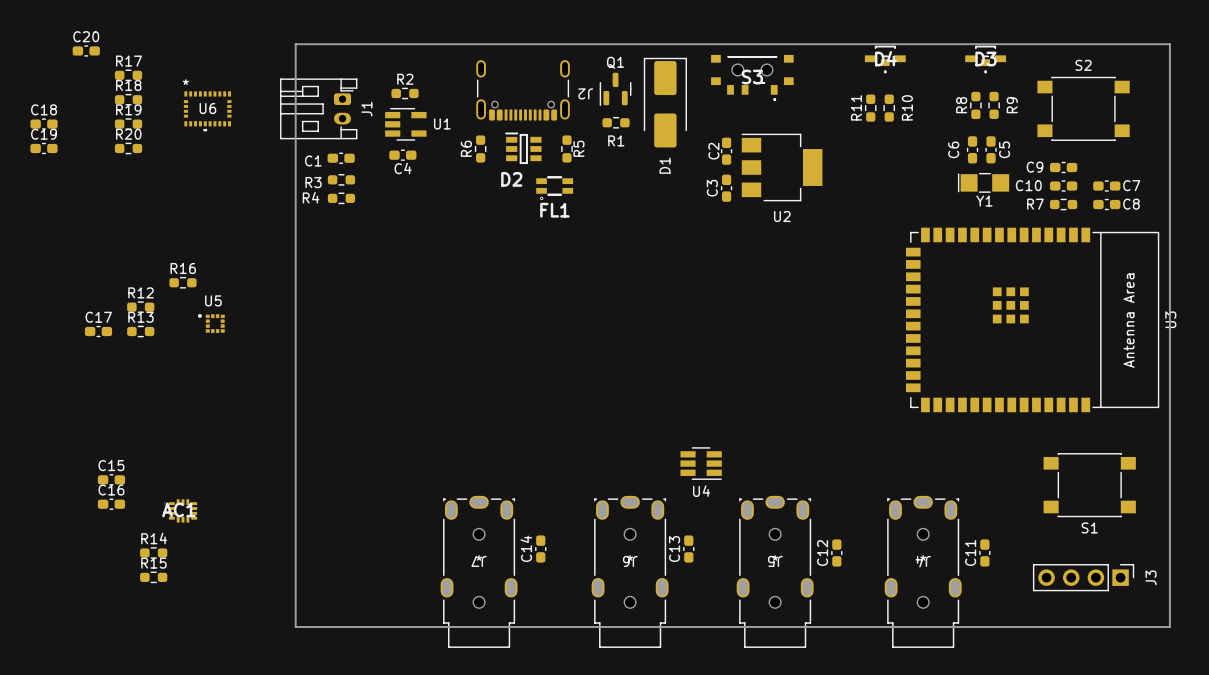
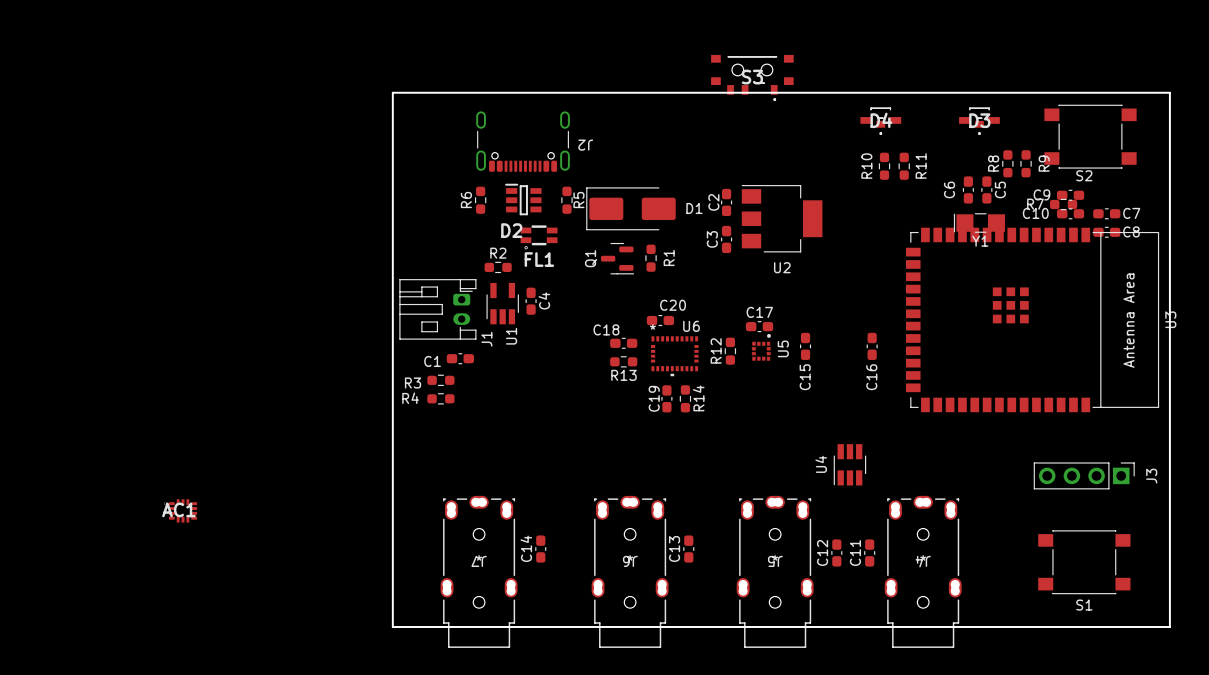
C20 name position: C20 (86, 36) -> C20 (673, 305)
C20 position: (86, 50) -> (660, 320)
D4 position: (885, 59) -> (880, 121)
D3 position: (985, 59) -> (979, 121)
S2 name position: S2 (1083, 65) -> S2 (1084, 175)
R17: (128, 75) -> none
Q1 rotation: 0° (615, 89) -> 90° counterclockwise (617, 258)
Q1 position: (615, 89) -> (617, 258)
J2 position: (523, 90) -> (523, 141)
board edge: (1169, 92) (1169, 44) (295, 44) (295, 627) (392, 627) -> (1169, 92) (392, 92) (392, 627)
R2 position: (405, 93) -> (498, 267)
R18: (128, 99) -> none
D1 rotation: 0° (665, 102) -> 90° counterclockwise (630, 208)
D1 position: (665, 102) -> (630, 208)
R8 position: (975, 105) -> (1007, 163)
R9 position: (994, 105) -> (1026, 163)
R11 name position: R11 (856, 107) -> R11 (921, 166)
R10 name position: R10 (907, 107) -> R10 (866, 166)
U6 name position: U6 (207, 108) -> U6 (691, 326)
J1 position: (318, 108) -> (437, 309)
R11 position: (870, 108) -> (904, 166)
R10 position: (889, 108) -> (884, 166)
S2 position: (1083, 108) -> (1090, 136)
C18 name position: C18 (44, 109) -> C18 (606, 329)
J1 name position: J1 (366, 109) -> J1 (486, 339)
U6 position: (207, 111) -> (674, 356)
R1 rotation: 0° (616, 122) -> 90° clockwise (651, 258)
R1 position: (616, 122) -> (651, 258)
U1 name position: U1 (442, 123) -> U1 (511, 336)
C18 position: (44, 124) -> (623, 343)
R19: (128, 124) -> none
U1 rotation: 0° (405, 124) -> 90° counterclockwise (502, 303)
U1 position: (405, 124) -> (502, 303)
R1 name position: R1 (616, 140) -> R1 (669, 257)
C19 rotation: 0° (44, 148) -> 90° clockwise (666, 398)
C19 position: (44, 148) -> (666, 398)
R20: (128, 148) -> none
D2 position: (523, 148) -> (523, 199)
R6 position: (480, 149) -> (480, 200)
R5 position: (566, 149) -> (566, 200)
C6 position: (972, 149) -> (968, 189)
C5 position: (991, 149) -> (986, 189)
C2 position: (726, 151) -> (726, 202)
C4 rotation: 0° (402, 155) -> 90° clockwise (531, 301)
C4 position: (402, 155) -> (531, 301)
C1 position: (341, 158) -> (460, 358)
U2 position: (782, 167) -> (782, 218)
C9 position: (1063, 167) -> (1070, 195)
C4 name position: C4 (403, 168) -> C4 (544, 300)
R3 position: (341, 179) -> (440, 380)
Y1 position: (983, 182) -> (979, 223)
C10 position: (1063, 186) -> (1070, 213)
C7 position: (1106, 186) -> (1106, 213)
FL1 position: (554, 188) -> (539, 237)
C3 position: (726, 188) -> (726, 239)
R4 position: (341, 198) -> (440, 398)
C8 position: (1106, 204) -> (1106, 232)
R16: (183, 282) -> none
R12 name position: R12 (140, 292) -> R12 (716, 350)
R12 rotation: 0° (140, 307) -> 90° clockwise (730, 351)
R12 position: (140, 307) -> (730, 351)
R13 name position: R13 (140, 317) -> R13 (623, 375)
U5 rotation: 0° (211, 323) -> 90° clockwise (761, 347)
U5 position: (211, 323) -> (761, 347)
C17 position: (98, 331) -> (759, 326)
R13 position: (140, 331) -> (623, 361)
U4 rotation: 0° (701, 463) -> 90° clockwise (849, 464)
U4 position: (701, 463) -> (849, 464)
C15 name position: C15 (111, 465) -> C15 (805, 377)
C15 rotation: 0° (111, 479) -> 90° clockwise (805, 346)
C15 position: (111, 479) -> (805, 346)
S1 position: (1089, 485) -> (1084, 562)
C16 name position: C16 (111, 489) -> C16 (871, 377)
C16 rotation: 0° (111, 504) -> 90° clockwise (872, 346)
C16 position: (111, 504) -> (872, 346)
R14 rotation: 0° (153, 552) -> 90° clockwise (685, 398)
R14 position: (153, 552) -> (685, 398)
C11 position: (984, 552) -> (869, 552)
R15: (153, 577) -> none
J3 position: (1083, 577) -> (1084, 475)

